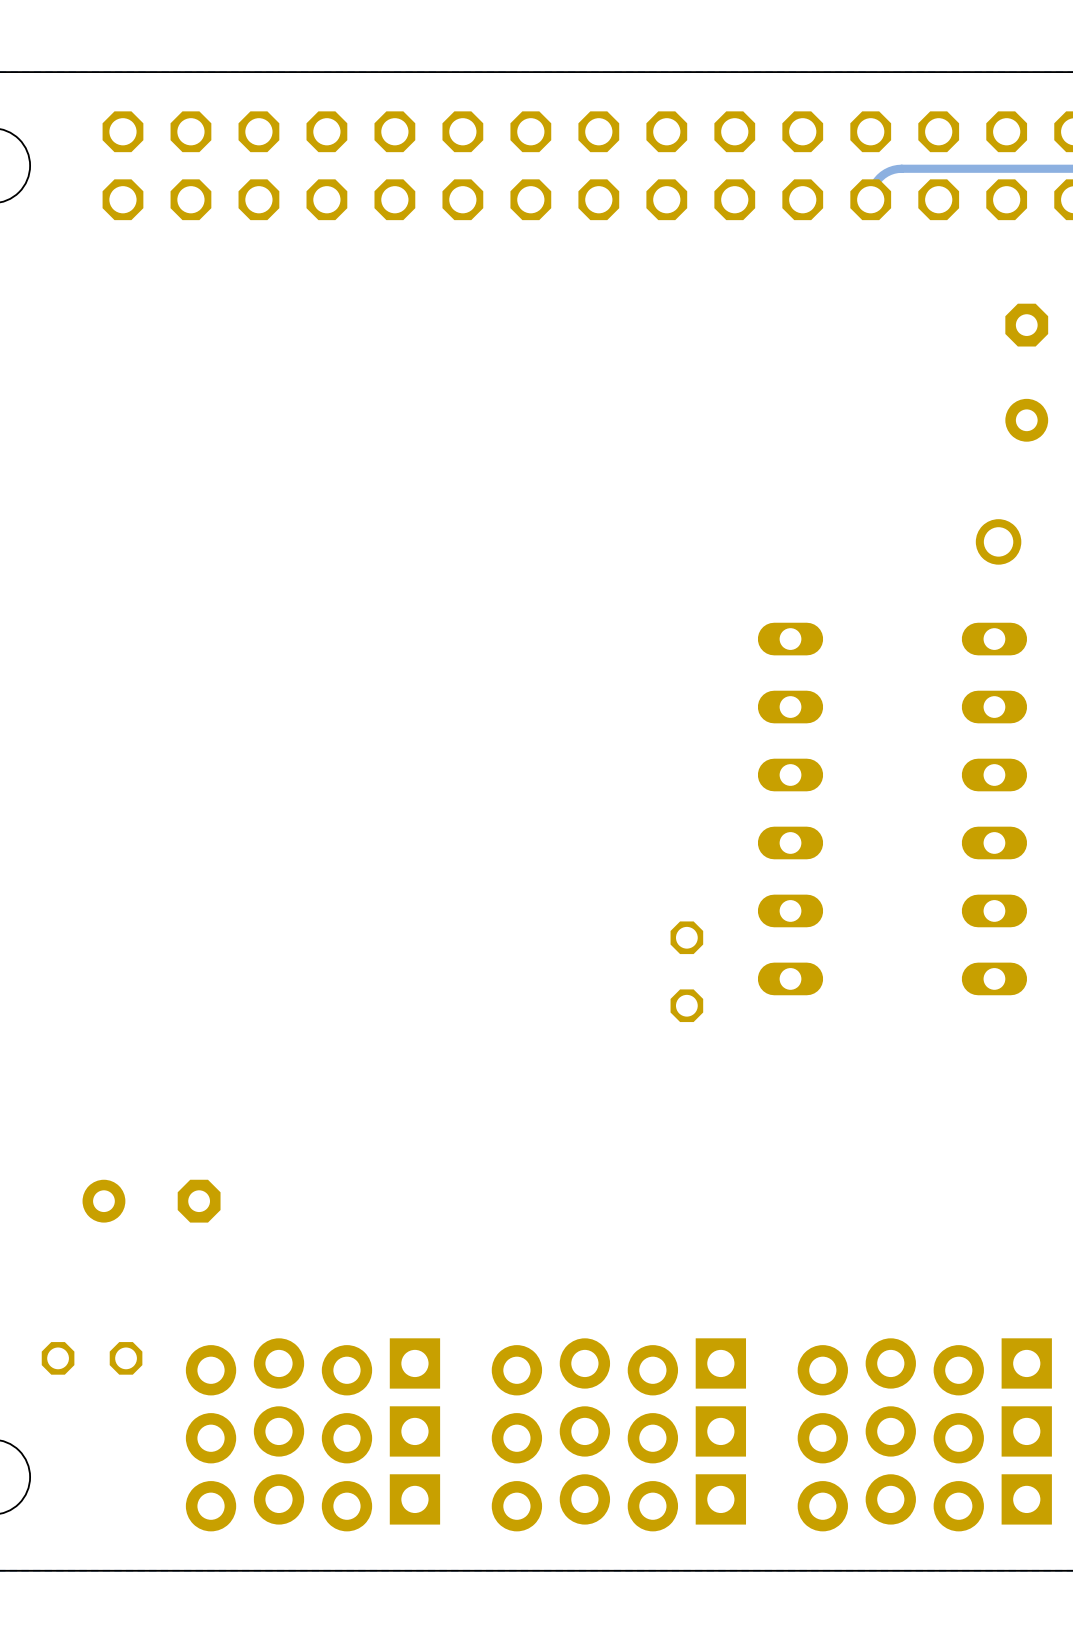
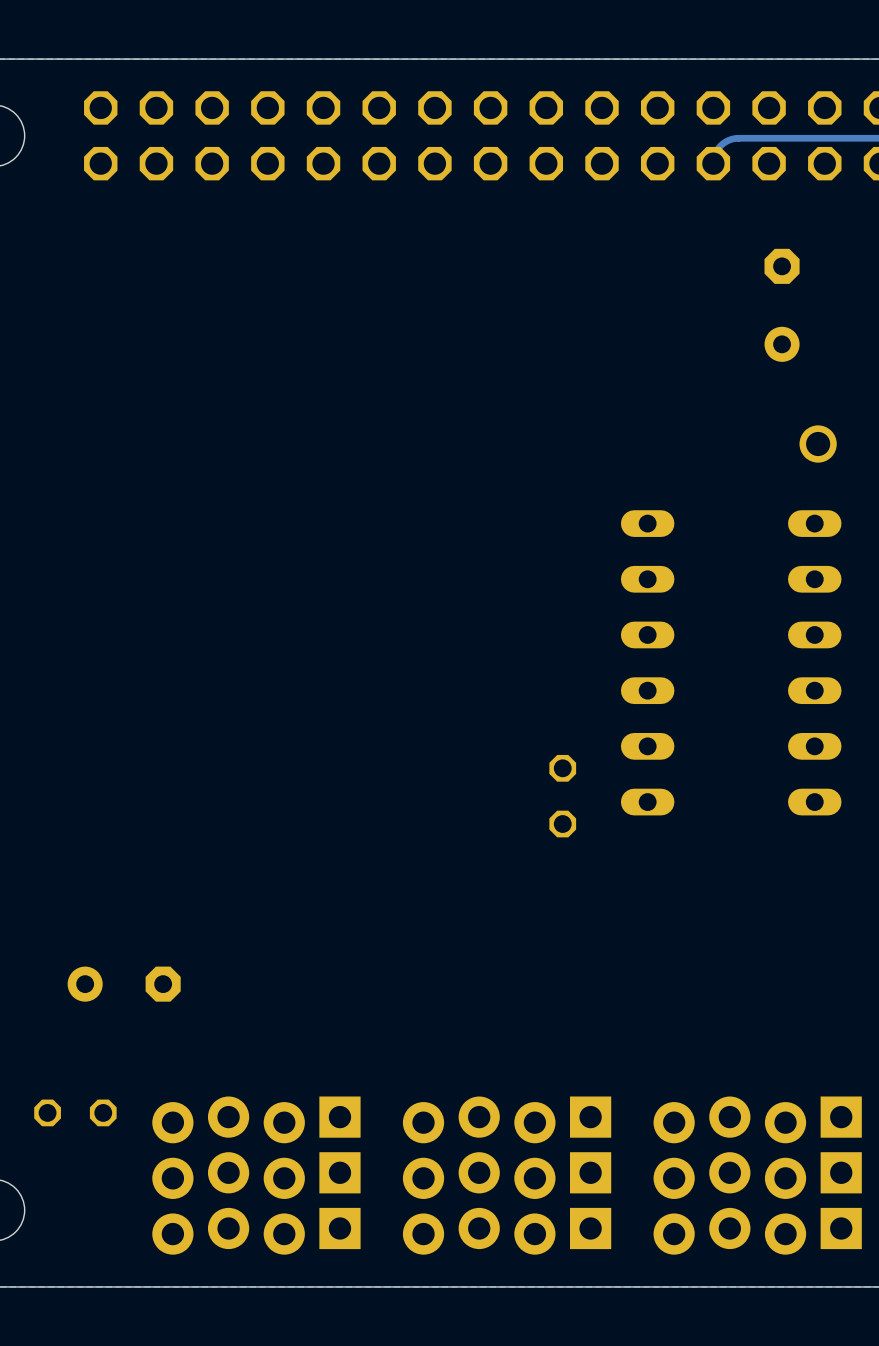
part position: (1026, 372) -> (782, 305)

